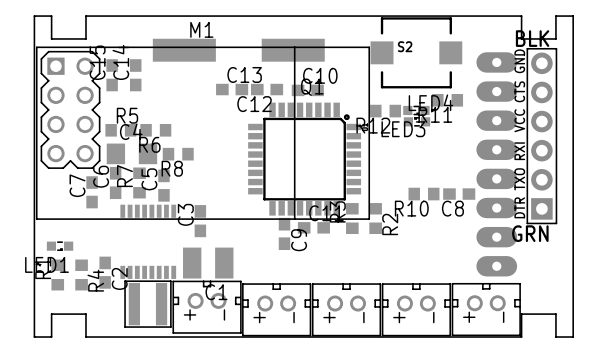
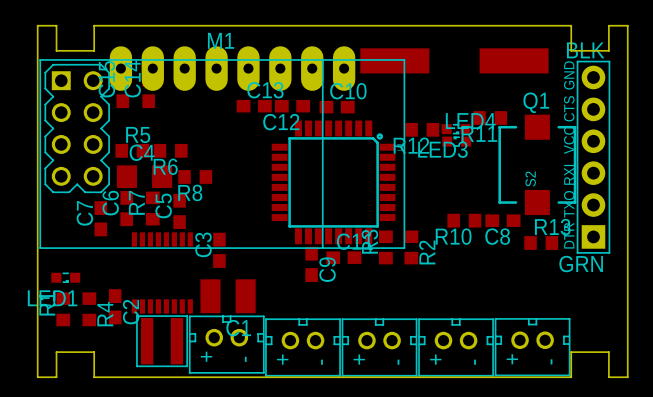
Q1 position: (238, 50) -> (454, 60)
S2 rotation: 0° (416, 52) -> 90° clockwise (537, 164)
S2 position: (416, 52) -> (537, 164)
part: none -> (232, 68)
part: (496, 164) -> none
R13: none -> (541, 242)

